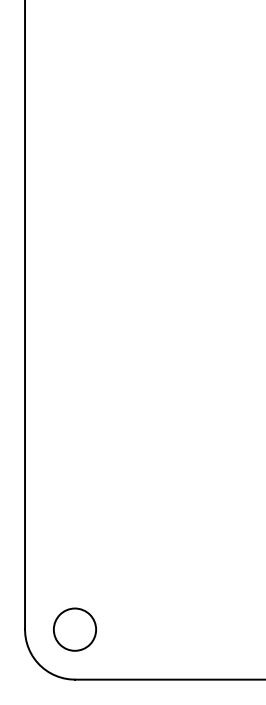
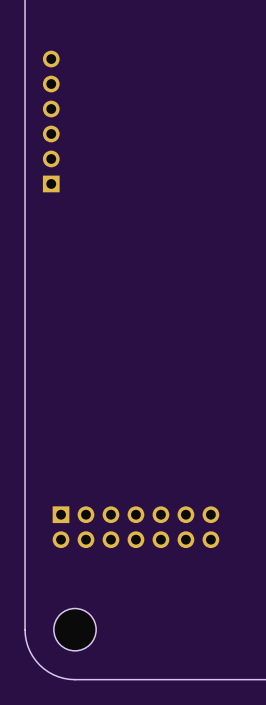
part: none -> (51, 121)
part: none -> (135, 527)

